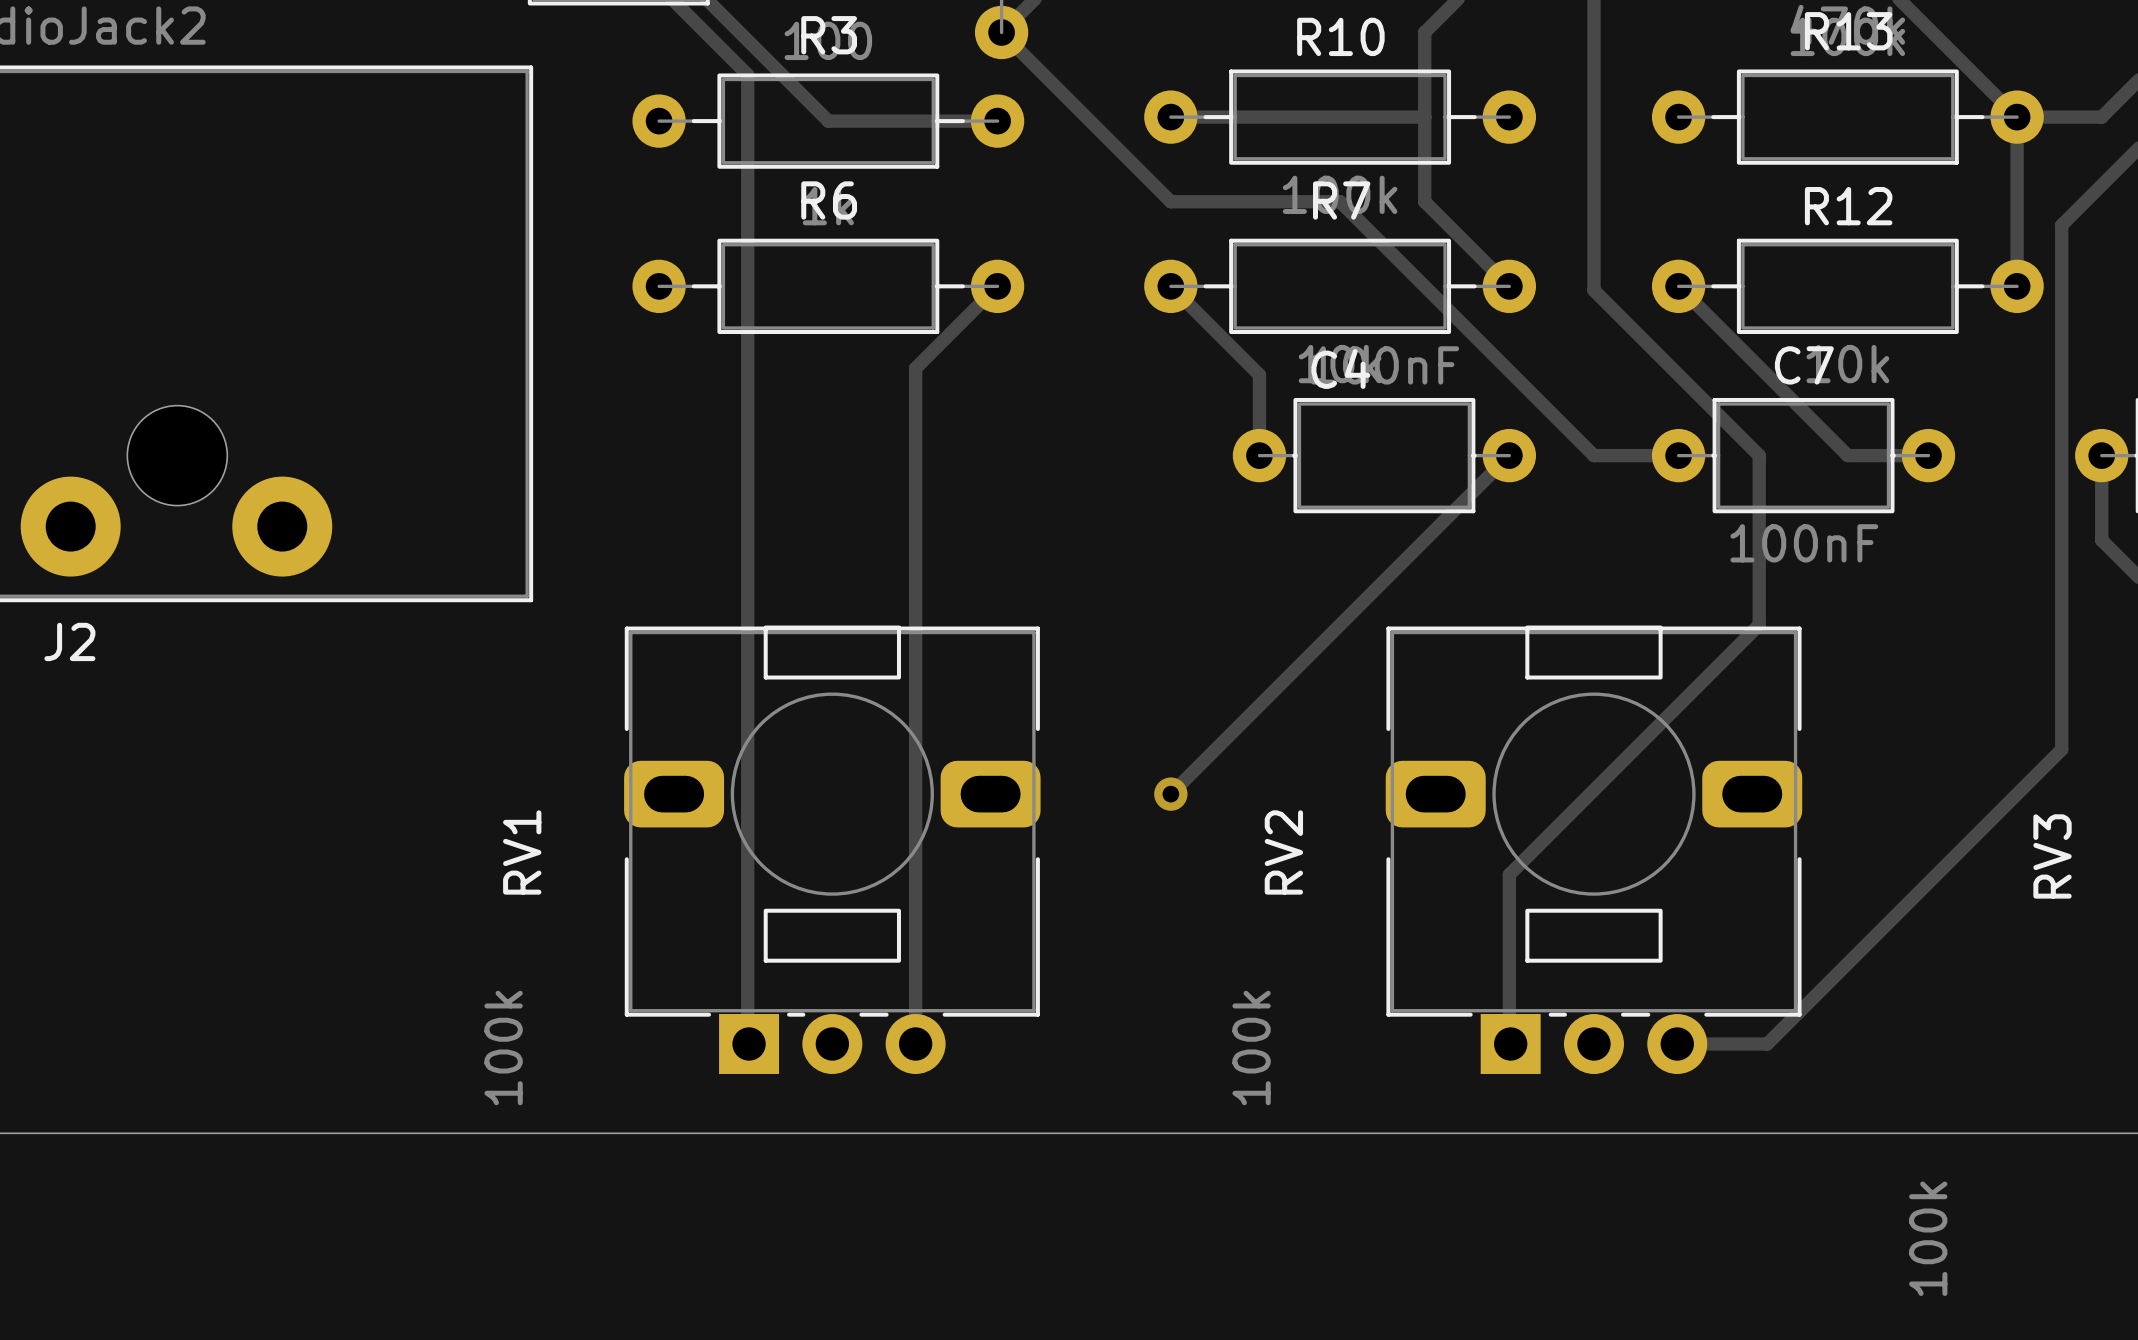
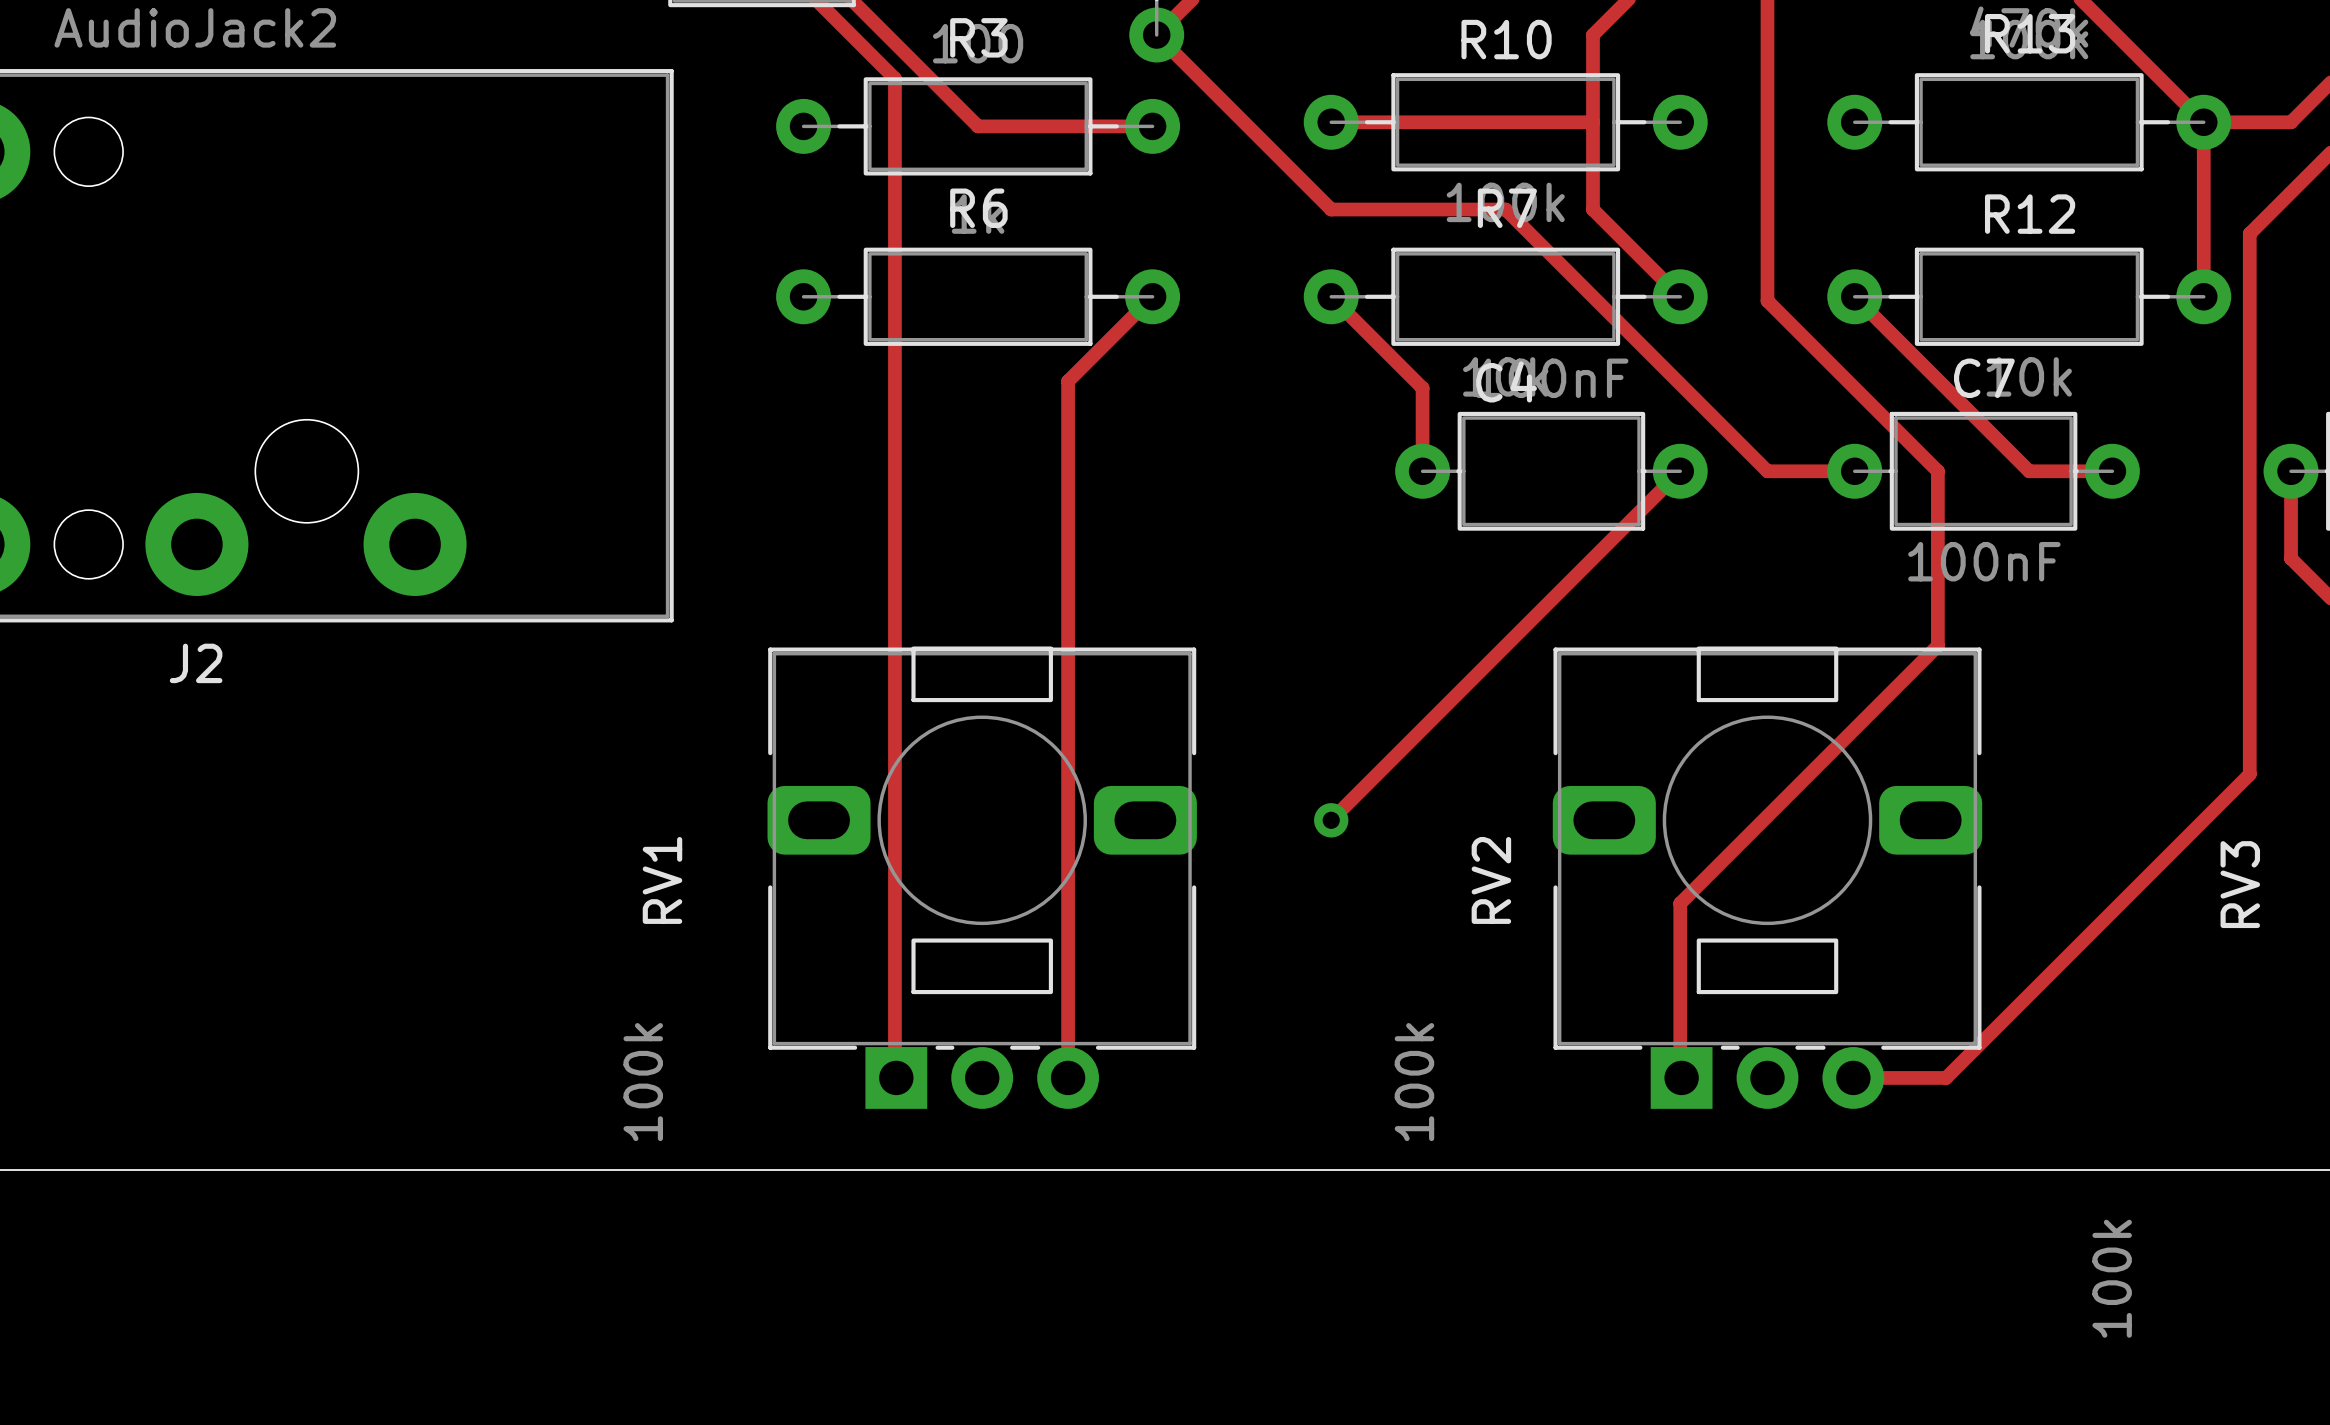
RV2 name position: RV2 (1283, 852) -> RV2 (1491, 880)

